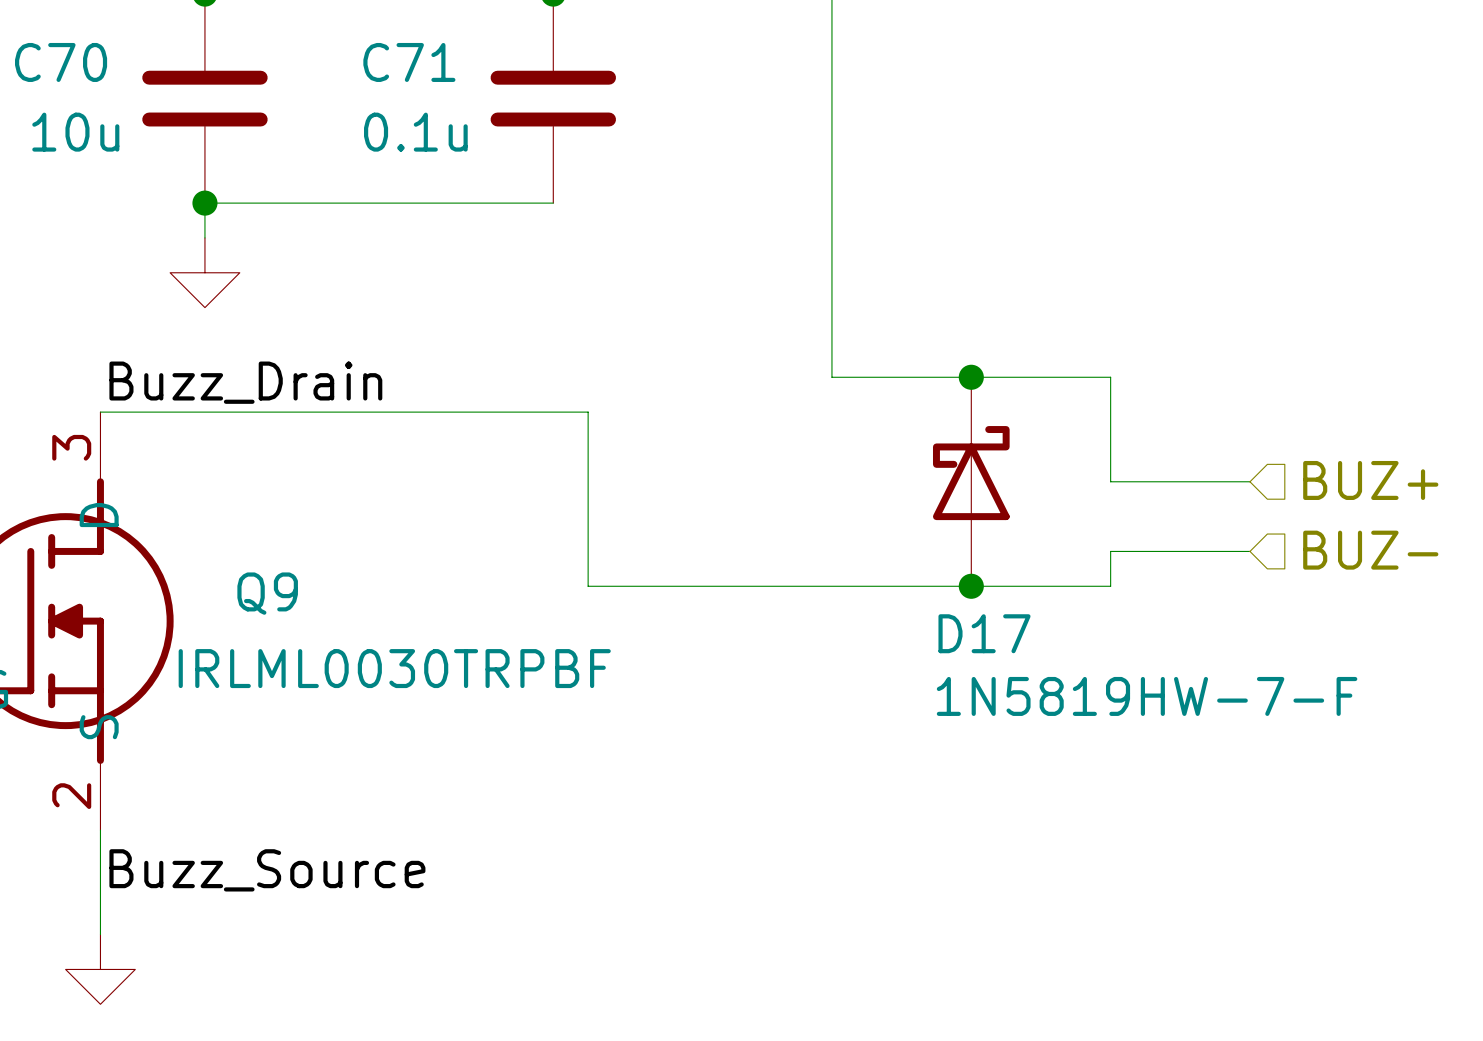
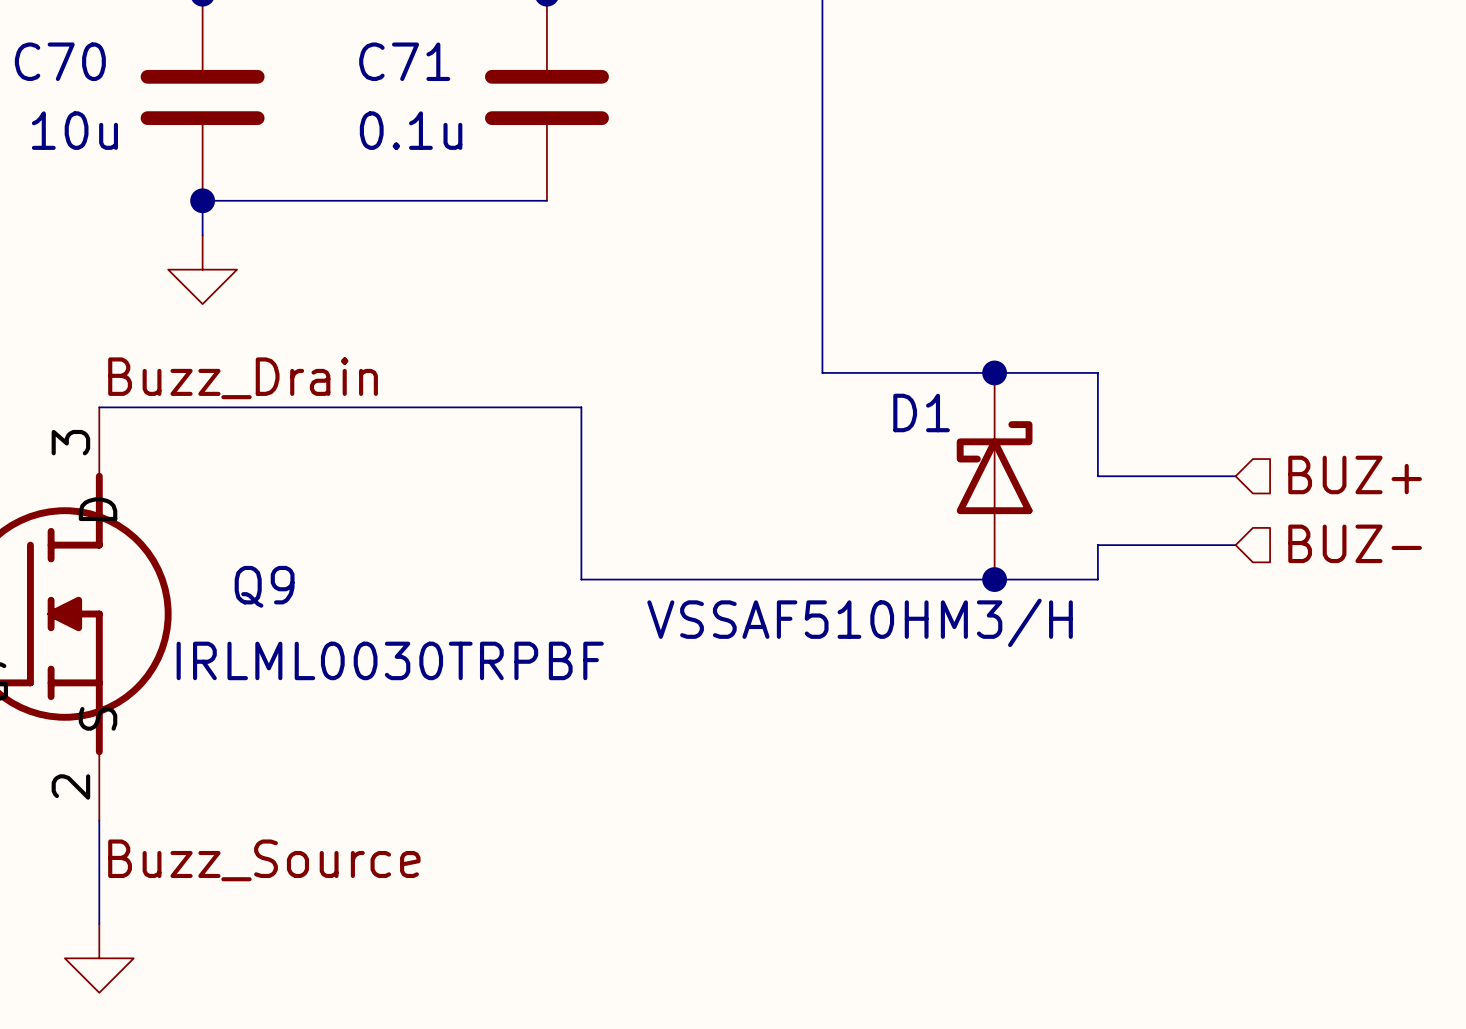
junction position: (971, 377) -> (994, 372)
D17: 1N5819HW-7-F (971, 481) -> none
D1: none -> VSSAF510HM3/H (994, 476)
junction position: (971, 586) -> (994, 579)

